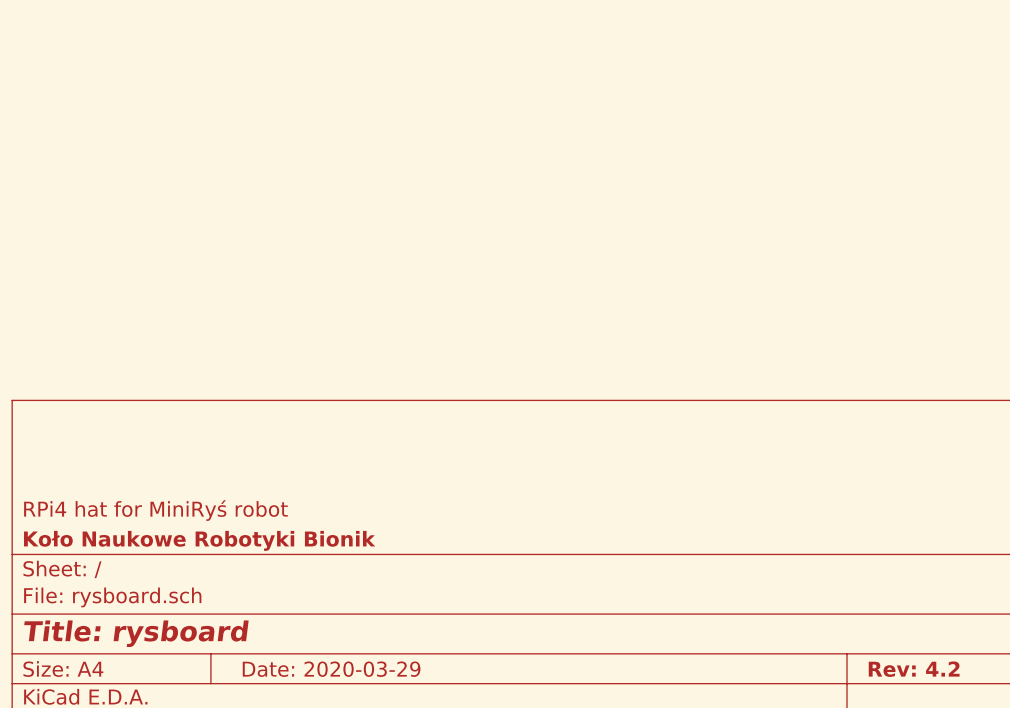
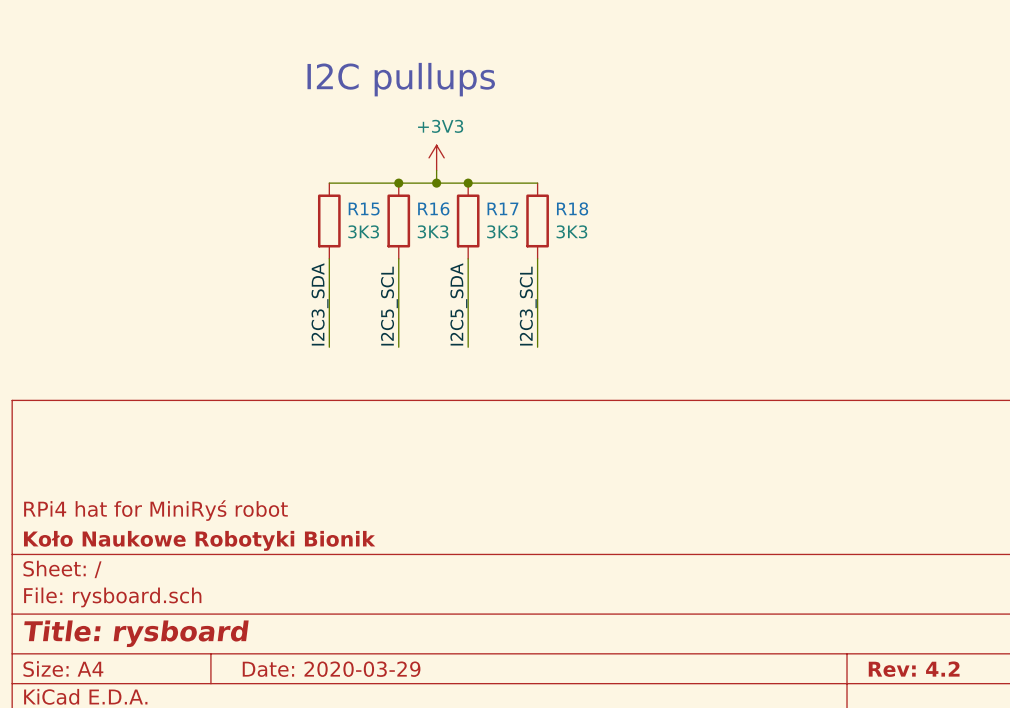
text: none -> I2C pullups (401, 79)
power symbol: none -> +3V3 (436, 157)
wire: none -> (436, 170) (436, 183)
wire: none -> (329, 183) (537, 183)
junction: none -> (398, 183)
junction: none -> (436, 183)
junction: none -> (468, 183)
R15: none -> 3K3 (329, 220)
R16: none -> 3K3 (398, 220)
R17: none -> 3K3 (468, 220)
R18: none -> 3K3 (537, 220)
wire: none -> (329, 258) (329, 347)
wire: none -> (398, 258) (398, 347)
wire: none -> (468, 258) (468, 347)
wire: none -> (537, 258) (537, 347)
label: none -> I2C3_SDA (320, 304)
label: none -> I2C5_SDA (458, 304)
label: none -> I2C5_SCL (389, 306)
label: none -> I2C3_SCL (528, 306)

